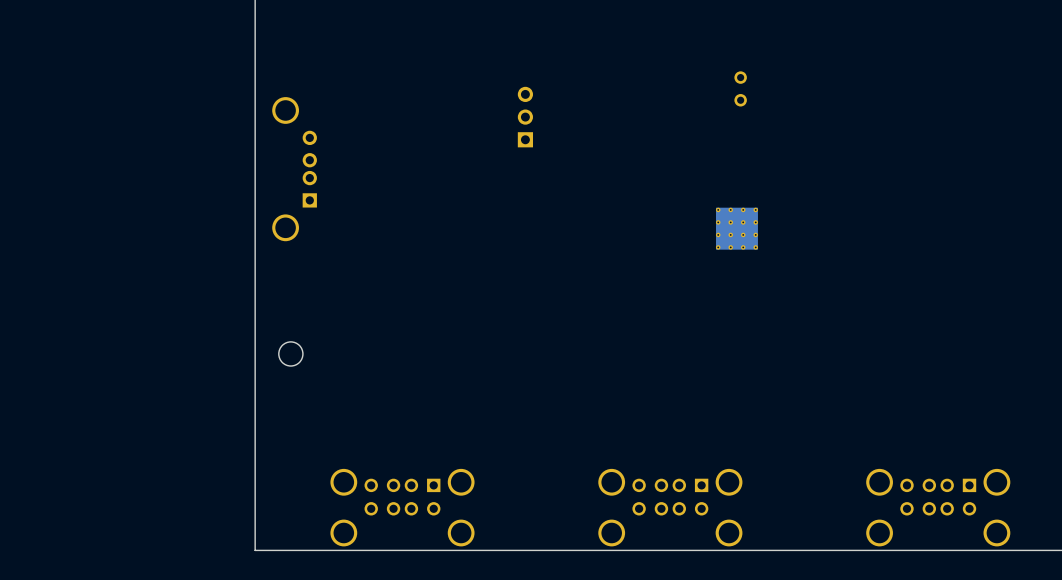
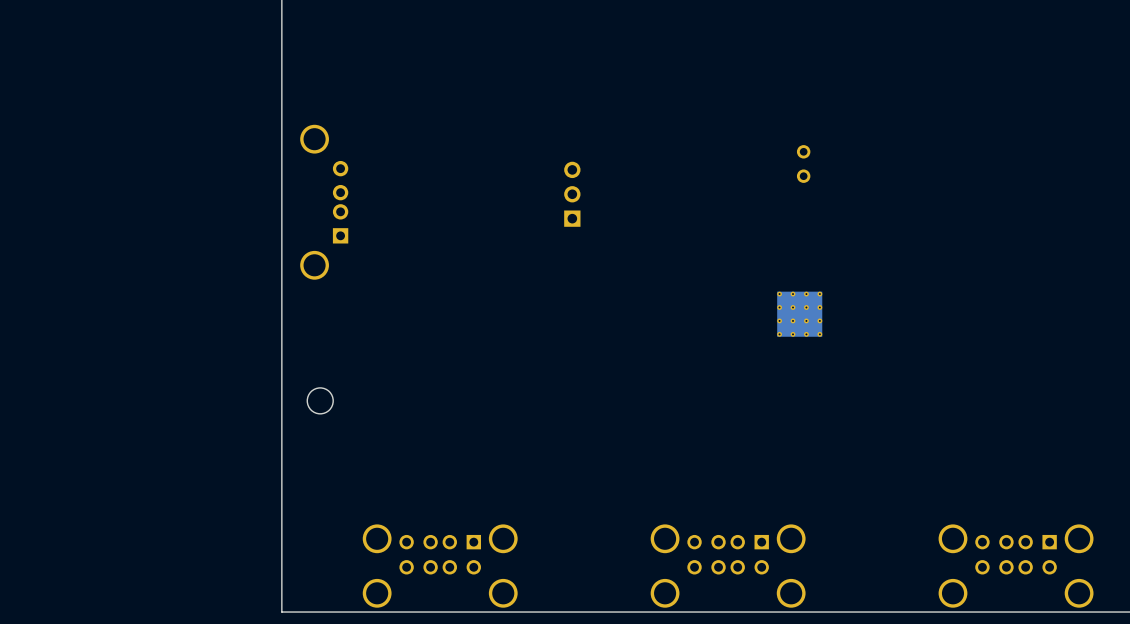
part position: (740, 88) -> (803, 163)
part position: (525, 117) -> (572, 194)
part position: (736, 228) -> (799, 314)

